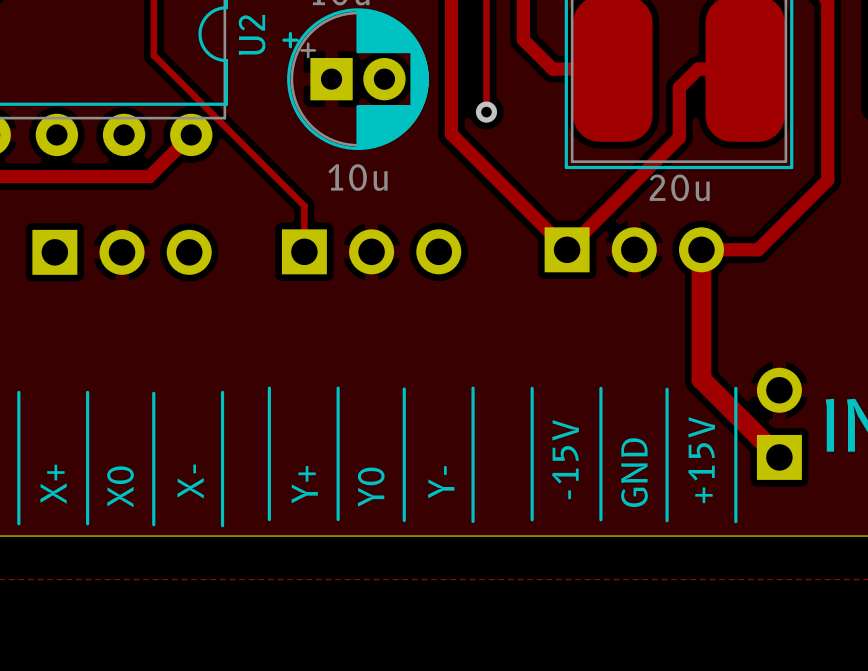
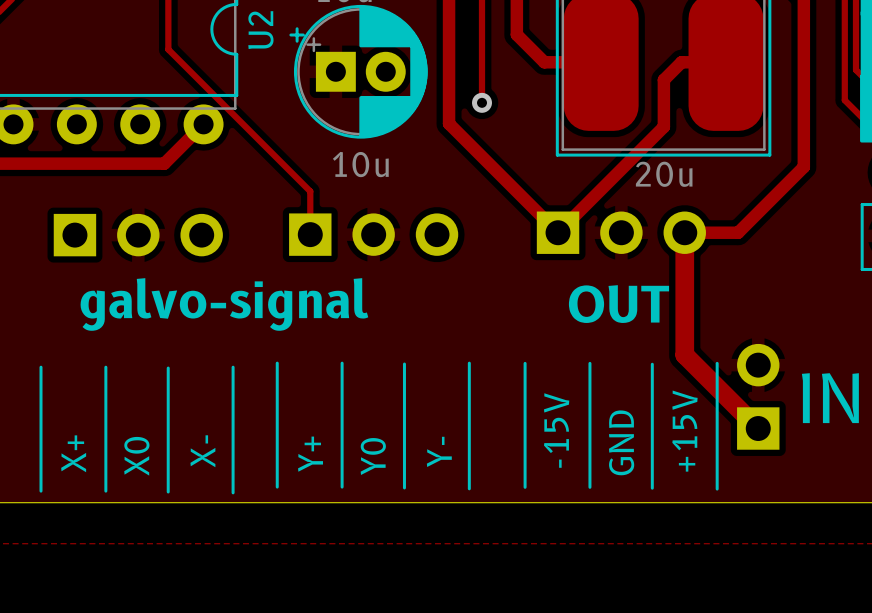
text: none -> galvo-signal (224, 304)
text: none -> OUT (619, 304)

